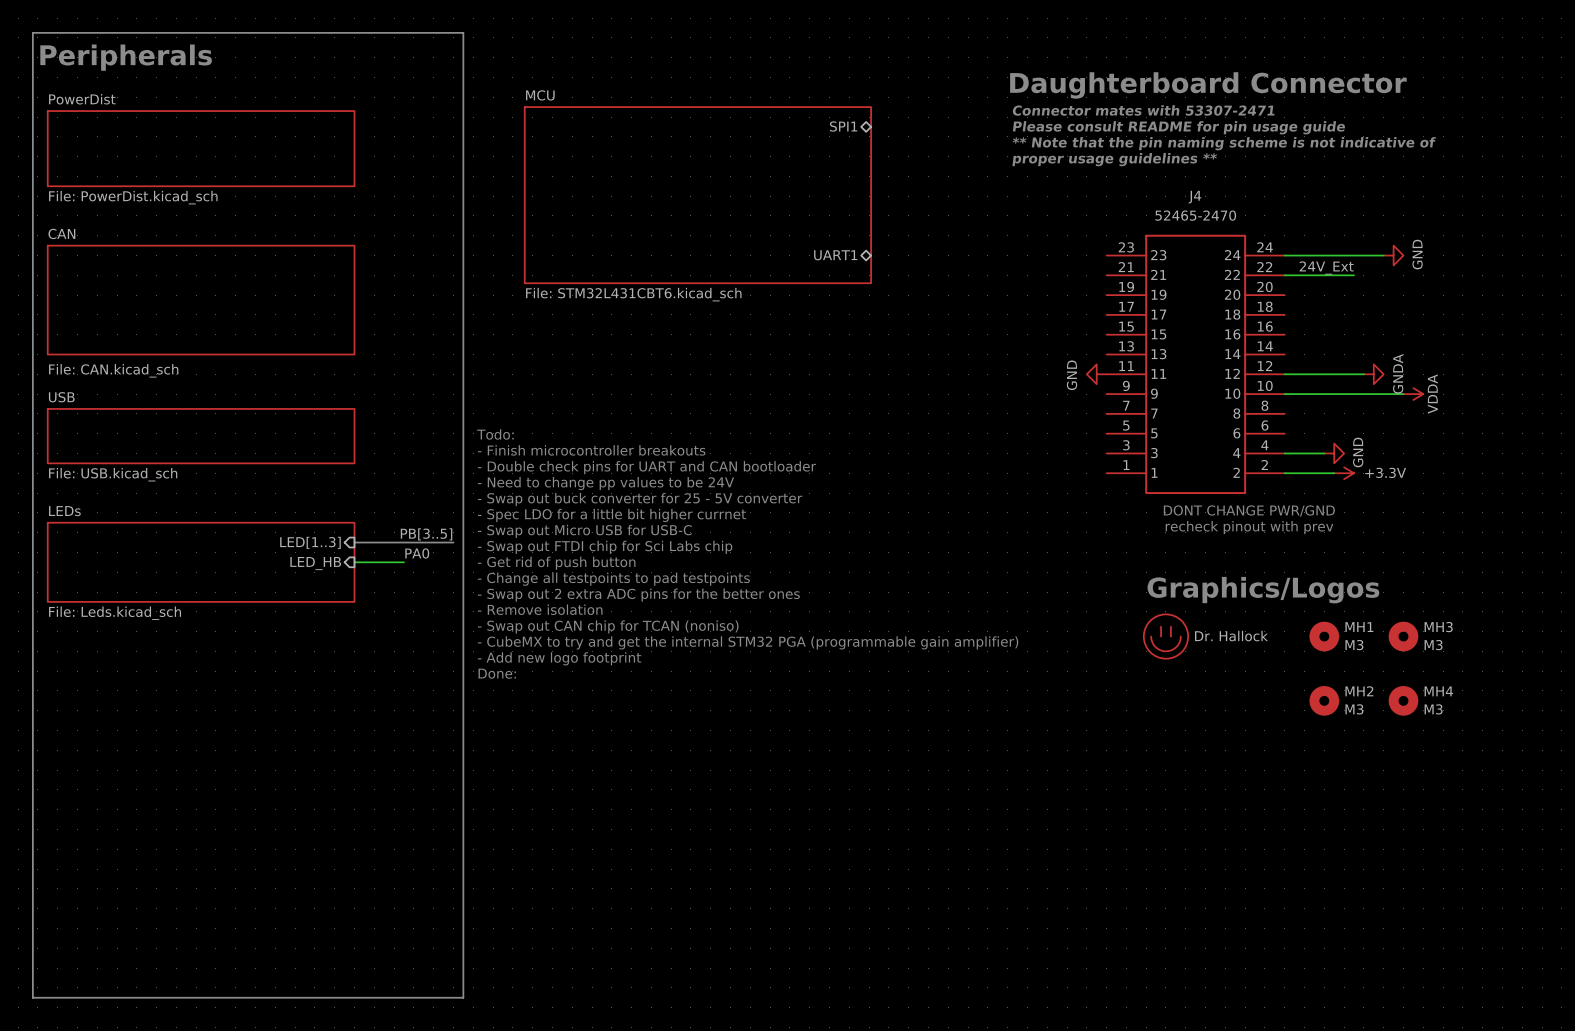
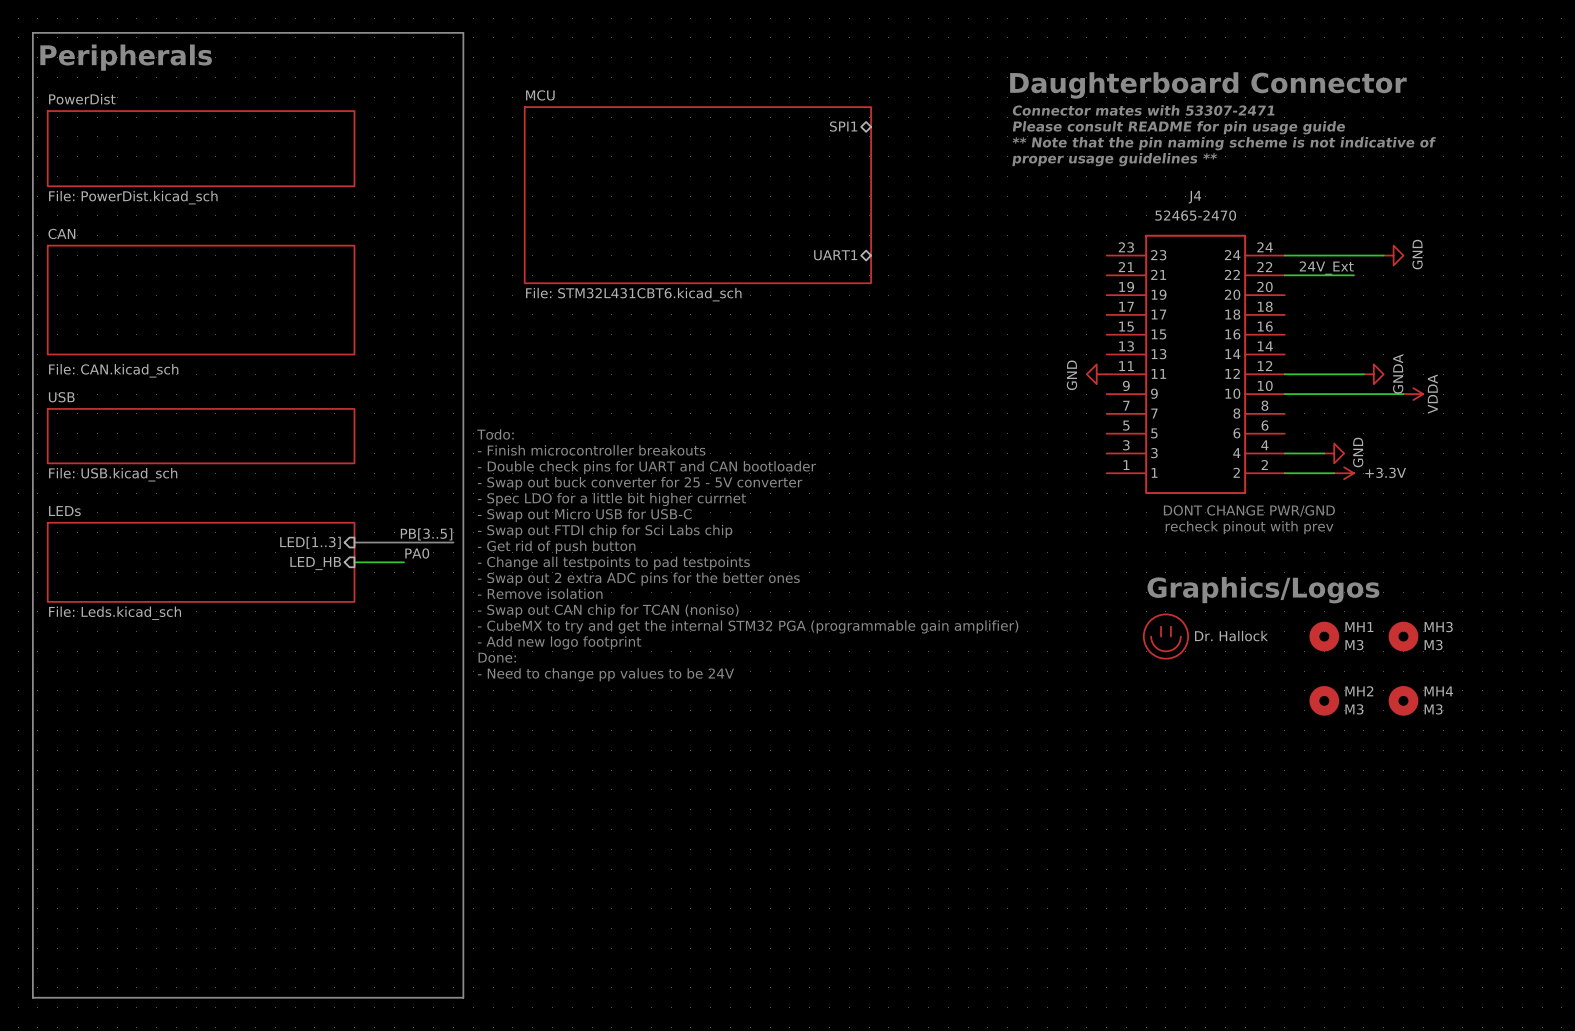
text: - Need to change pp values to be 24V (605, 483) -> - Swap out buck converter for 25 - 5V converter (640, 483)
text: - Swap out buck converter for 25 - 5V converter (640, 499) -> - Spec LDO for a little bit higher currnet (611, 499)
text: - Spec LDO for a little bit higher currnet (611, 515) -> - Swap out Micro USB for USB-C (584, 515)
text: - Swap out Micro USB for USB-C (584, 531) -> - Swap out FTDI chip for Sci Labs chip (605, 531)
text: - Swap out FTDI chip for Sci Labs chip (605, 547) -> - Get rid of push button (556, 547)
text: - Get rid of push button (556, 563) -> - Change all testpoints to pad testpoints (613, 563)
text: - Change all testpoints to pad testpoints (613, 579) -> - Swap out 2 extra ADC pins for the better ones (638, 579)
text: - Swap out 2 extra ADC pins for the better ones (638, 595) -> - Remove isolation (540, 593)
text: - Remove isolation (540, 609) -> - Swap out CAN chip for TCAN (noniso) (608, 611)
text: - Swap out CAN chip for TCAN (noniso) (608, 626) -> - CubeMX to try and get the internal STM32 PGA (programmable gain amplifier) (748, 626)
text: - CubeMX to try and get the internal STM32 PGA (programmable gain amplifier) (748, 642) -> - Add new logo footprint (559, 642)
text: - Add new logo footprint (559, 658) -> Done: (497, 657)
text: Done: (497, 673) -> - Need to change pp values to be 24V (605, 674)

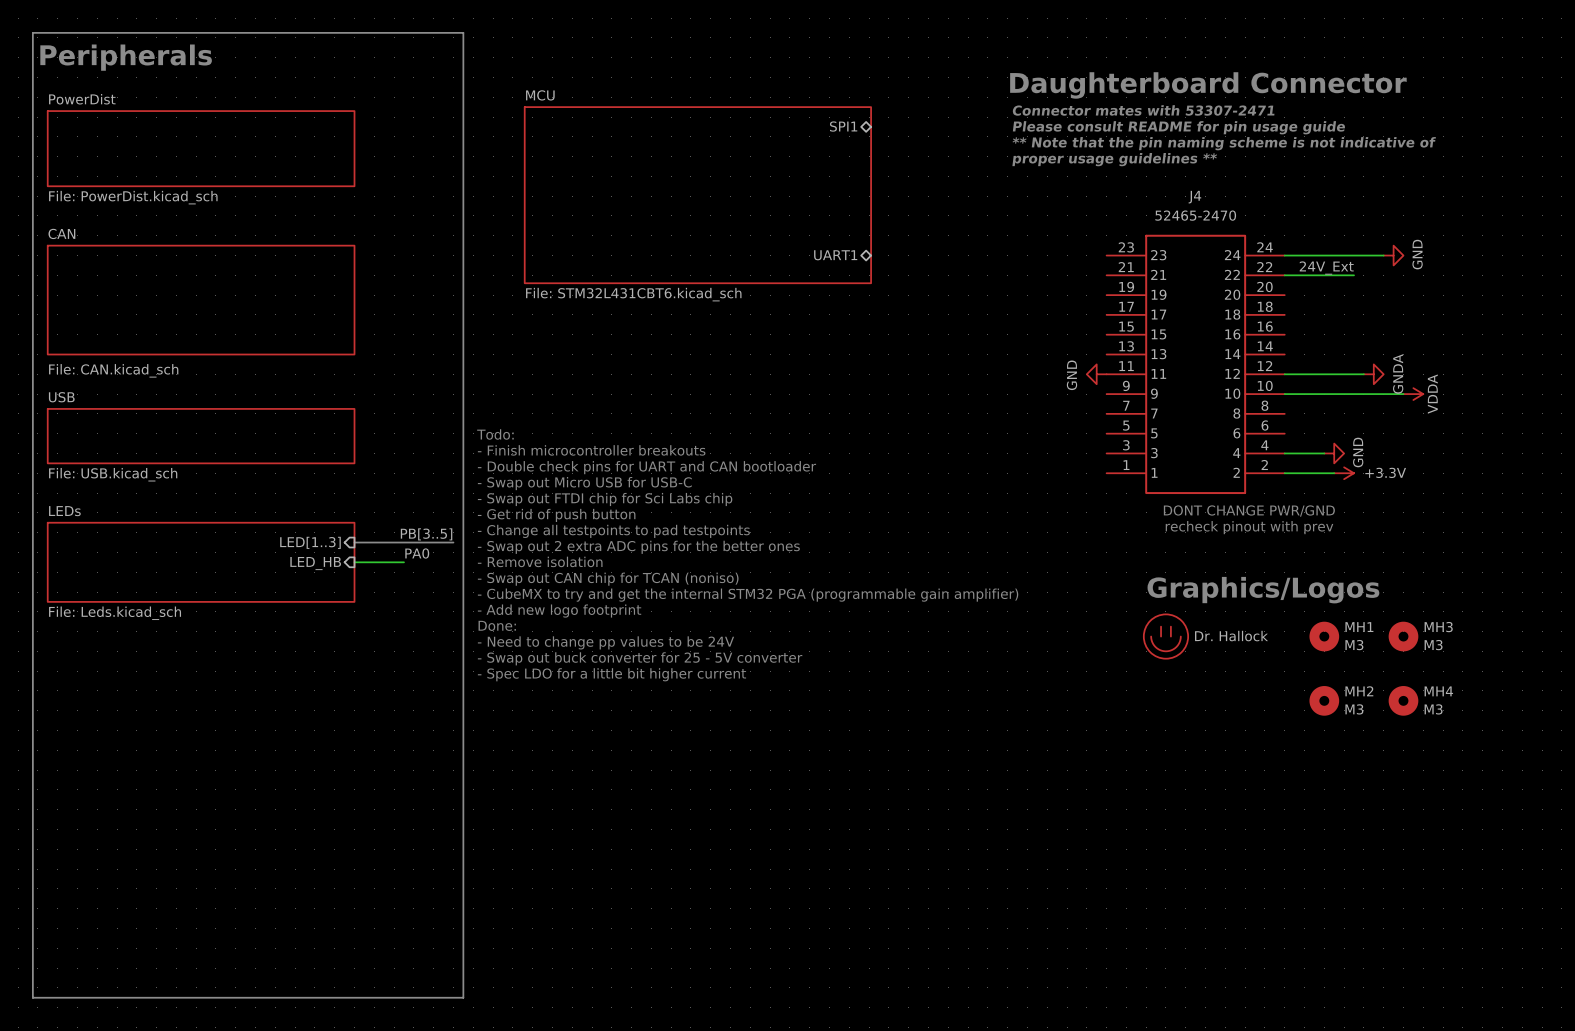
text: - Swap out buck converter for 25 - 5V converter (640, 483) -> - Swap out Micro USB for USB-C (584, 483)
text: - Spec LDO for a little bit higher currnet (611, 499) -> - Swap out FTDI chip for Sci Labs chip (605, 499)
text: - Swap out Micro USB for USB-C (584, 515) -> - Get rid of push button (556, 515)
text: - Swap out FTDI chip for Sci Labs chip (605, 531) -> - Change all testpoints to pad testpoints (613, 531)
text: - Get rid of push button (556, 547) -> - Swap out 2 extra ADC pins for the better ones (638, 547)
text: - Change all testpoints to pad testpoints (613, 563) -> - Remove isolation (540, 561)
text: - Swap out 2 extra ADC pins for the better ones (638, 579) -> - Swap out CAN chip for TCAN (noniso) (608, 579)
text: - Remove isolation (540, 593) -> - CubeMX to try and get the internal STM32 PGA (programmable gain amplifier) (748, 595)
text: - Swap out CAN chip for TCAN (noniso) (608, 611) -> - Add new logo footprint (559, 611)
text: - CubeMX to try and get the internal STM32 PGA (programmable gain amplifier) (748, 626) -> Done: (497, 625)
text: - Add new logo footprint (559, 642) -> - Need to change pp values to be 24V (605, 642)
text: Done: (497, 657) -> - Swap out buck converter for 25 - 5V converter (640, 658)
text: - Need to change pp values to be 24V (605, 674) -> - Spec LDO for a little bit higher current (611, 674)

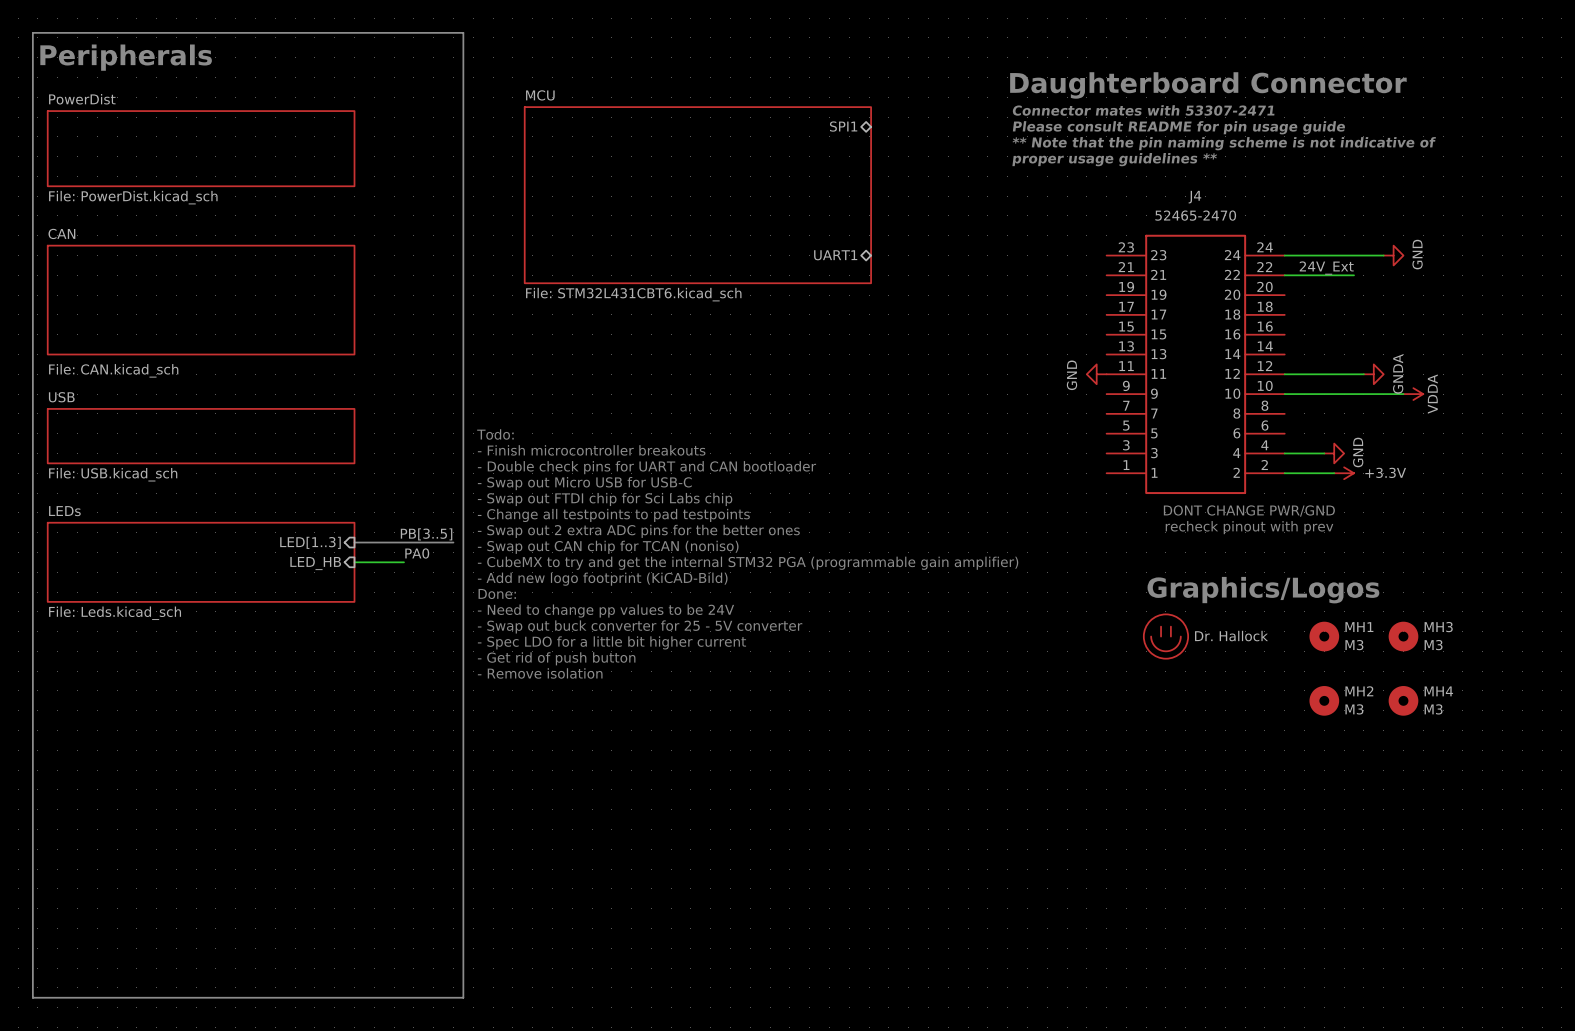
text: - Get rid of push button (556, 515) -> - Change all testpoints to pad testpoints (613, 515)
text: - Change all testpoints to pad testpoints (613, 531) -> - Swap out 2 extra ADC pins for the better ones (638, 531)
text: - Swap out 2 extra ADC pins for the better ones (638, 547) -> - Swap out CAN chip for TCAN (noniso) (608, 547)
text: - Remove isolation (540, 561) -> - CubeMX to try and get the internal STM32 PGA (programmable gain amplifier) (748, 563)
text: - Swap out CAN chip for TCAN (noniso) (608, 579) -> - Add new logo footprint (KiCAD-Bild) (602, 579)
text: - CubeMX to try and get the internal STM32 PGA (programmable gain amplifier) (748, 595) -> Done: (497, 593)
text: - Add new logo footprint (559, 611) -> - Need to change pp values to be 24V (605, 611)
text: Done: (497, 625) -> - Swap out buck converter for 25 - 5V converter (640, 626)
text: - Need to change pp values to be 24V (605, 642) -> - Spec LDO for a little bit higher current (611, 642)
text: - Swap out buck converter for 25 - 5V converter (640, 658) -> - Get rid of push button (556, 658)
text: - Spec LDO for a little bit higher current (611, 674) -> - Remove isolation (540, 673)

